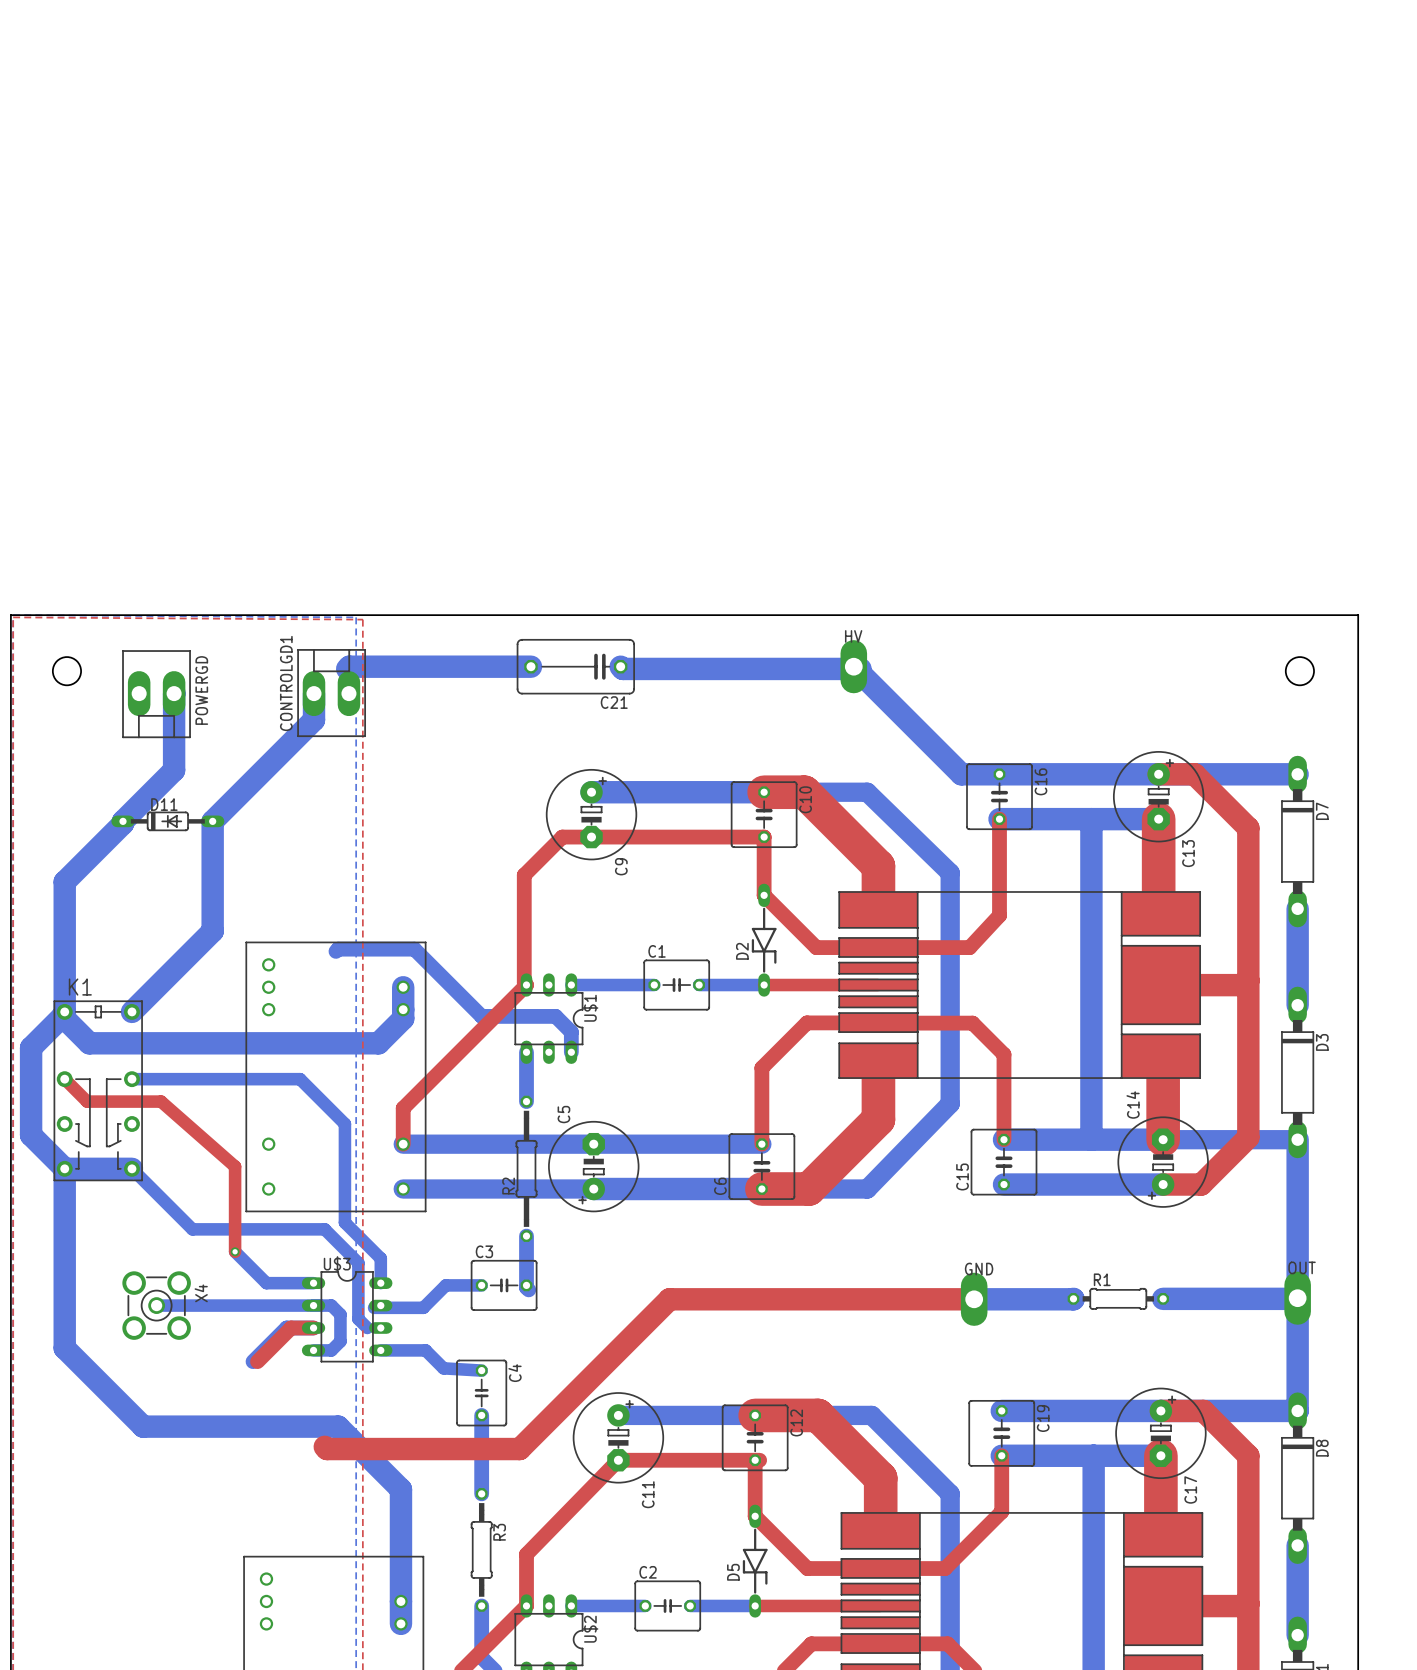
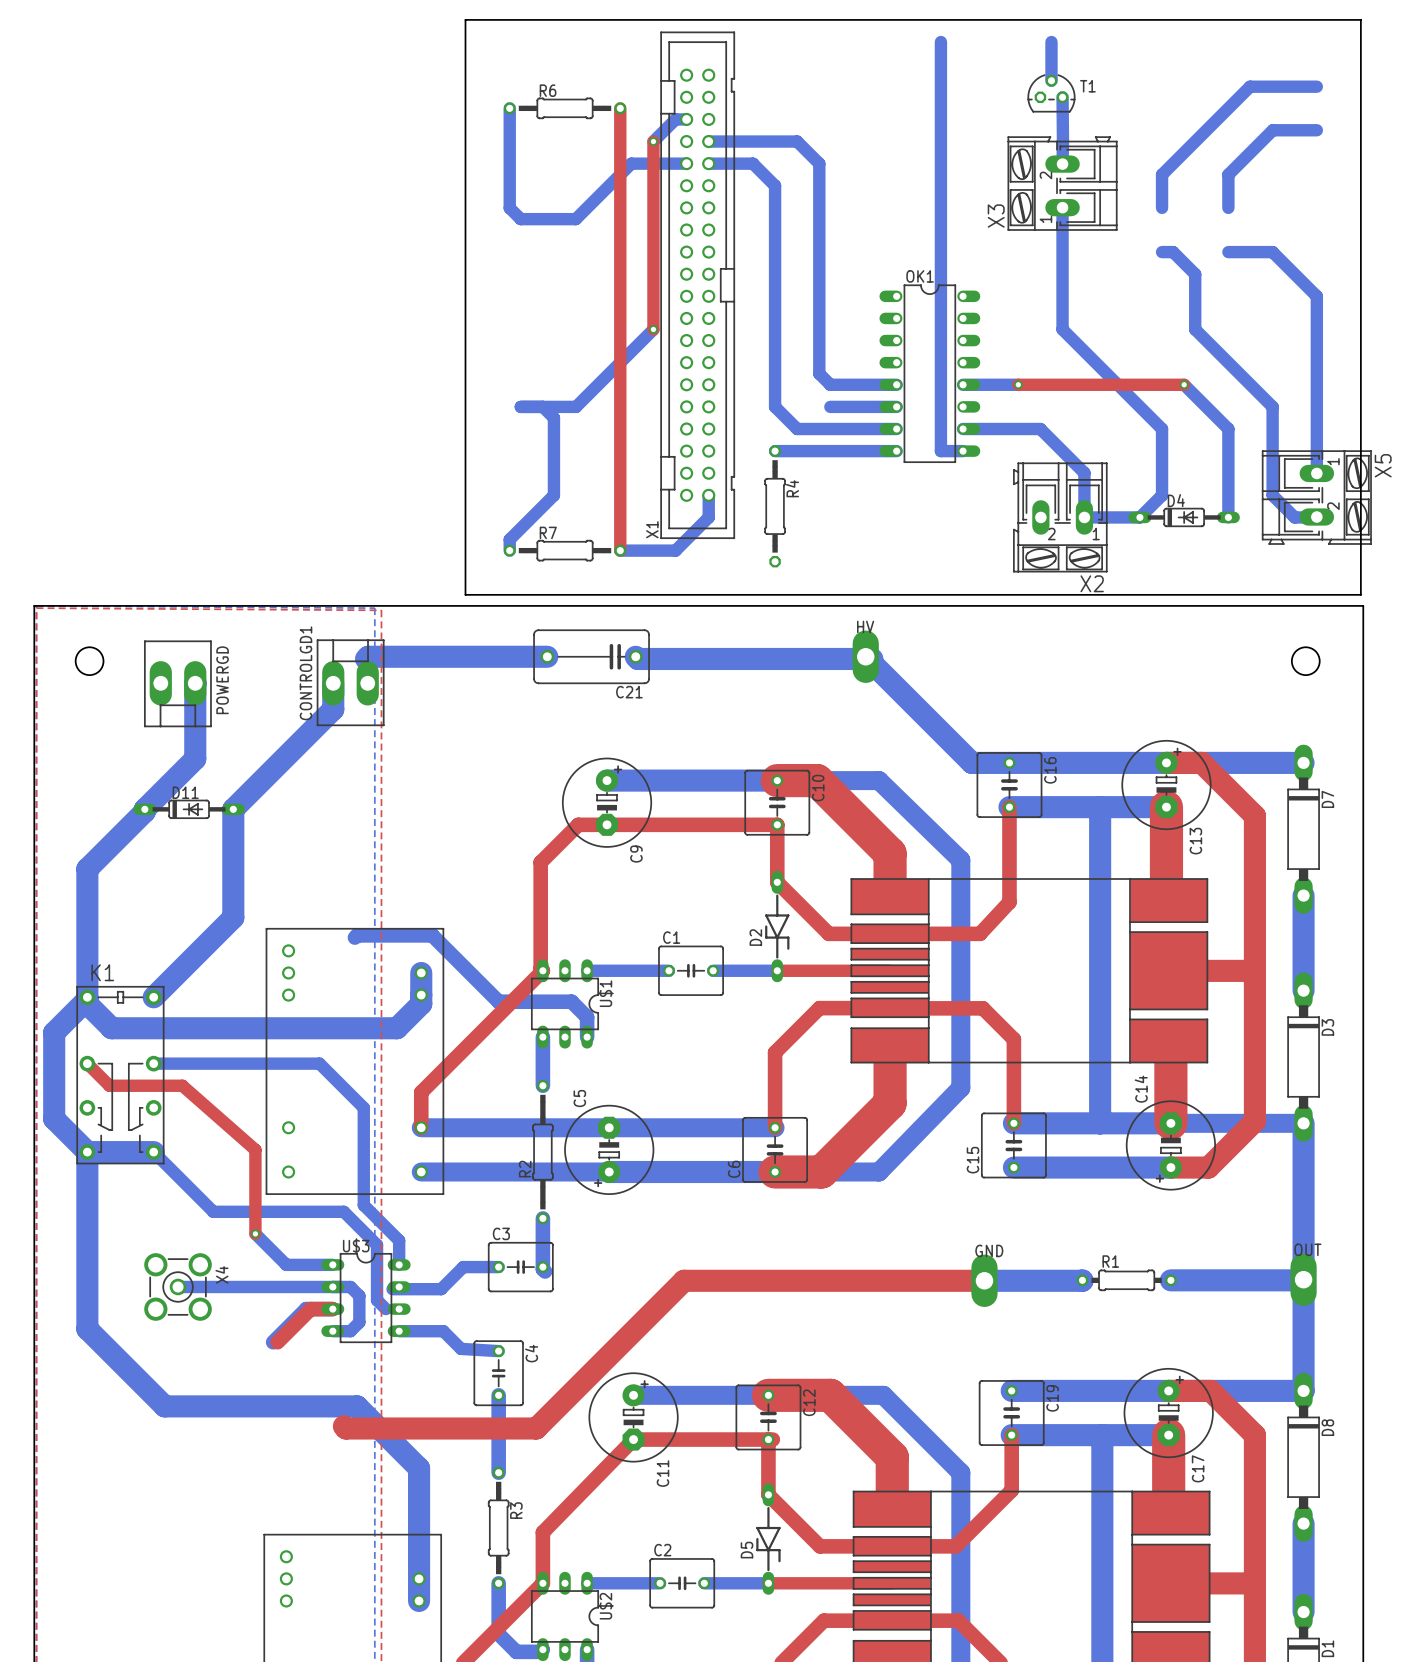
board edge: none -> (465, 19) (1360, 19) (1360, 594) (465, 594) (465, 19)
bottom track: none -> (940, 42) (940, 451) (963, 451)
bottom track: none -> (1051, 42) (1051, 80)
bottom track: none -> (1316, 86) (1250, 86) (1162, 174) (1162, 207)
T1: none -> (1051, 93)
bottom track: none -> (1062, 97) (1062, 164)
bottom track: none -> (509, 108) (509, 208) (520, 219) (575, 219) (631, 163) (686, 163)
R6: none -> (565, 108)
top track: none -> (620, 108) (620, 550)
bottom track: none -> (686, 119) (675, 119) (653, 141)
bottom track: none -> (1316, 130) (1272, 130) (1228, 174) (1228, 207)
top track: none -> (653, 141) (653, 329)
via: none -> (653, 141)
bottom track: none -> (708, 141) (797, 141) (819, 163) (819, 373) (830, 384) (896, 384)
bottom track: none -> (708, 163) (752, 163) (775, 185) (775, 406) (797, 429) (896, 429)
X3: none -> (1062, 183)
bottom track: none -> (1062, 207) (1062, 329) (1162, 429) (1162, 495) (1139, 517) (1084, 517) (1084, 473) (1040, 429) (963, 429)
bottom track: none -> (1162, 252) (1173, 252) (1195, 274) (1195, 329) (1272, 406) (1272, 495) (1294, 517) (1316, 517)
bottom track: none -> (1228, 252) (1272, 252) (1316, 296) (1316, 473)
X1: none -> (697, 285)
bottom track: none -> (653, 329) (576, 406) (520, 406)
via: none -> (653, 329)
OK1: none -> (929, 373)
bottom track: none -> (963, 384) (1018, 384)
top track: none -> (1018, 384) (1184, 384)
via: none -> (1018, 384)
bottom track: none -> (1184, 384) (1228, 429) (1228, 517)
via: none -> (1184, 384)
bottom track: none -> (542, 406) (553, 417) (553, 495) (509, 539) (509, 550)
bottom track: none -> (830, 406) (896, 406)
bottom track: none -> (775, 451) (896, 451)
bottom track: none -> (708, 495) (708, 517) (675, 550) (620, 550)
X5: none -> (1316, 497)
R4: none -> (775, 506)
X2: none -> (1060, 517)
D4: none -> (1184, 517)
R7: none -> (565, 550)

